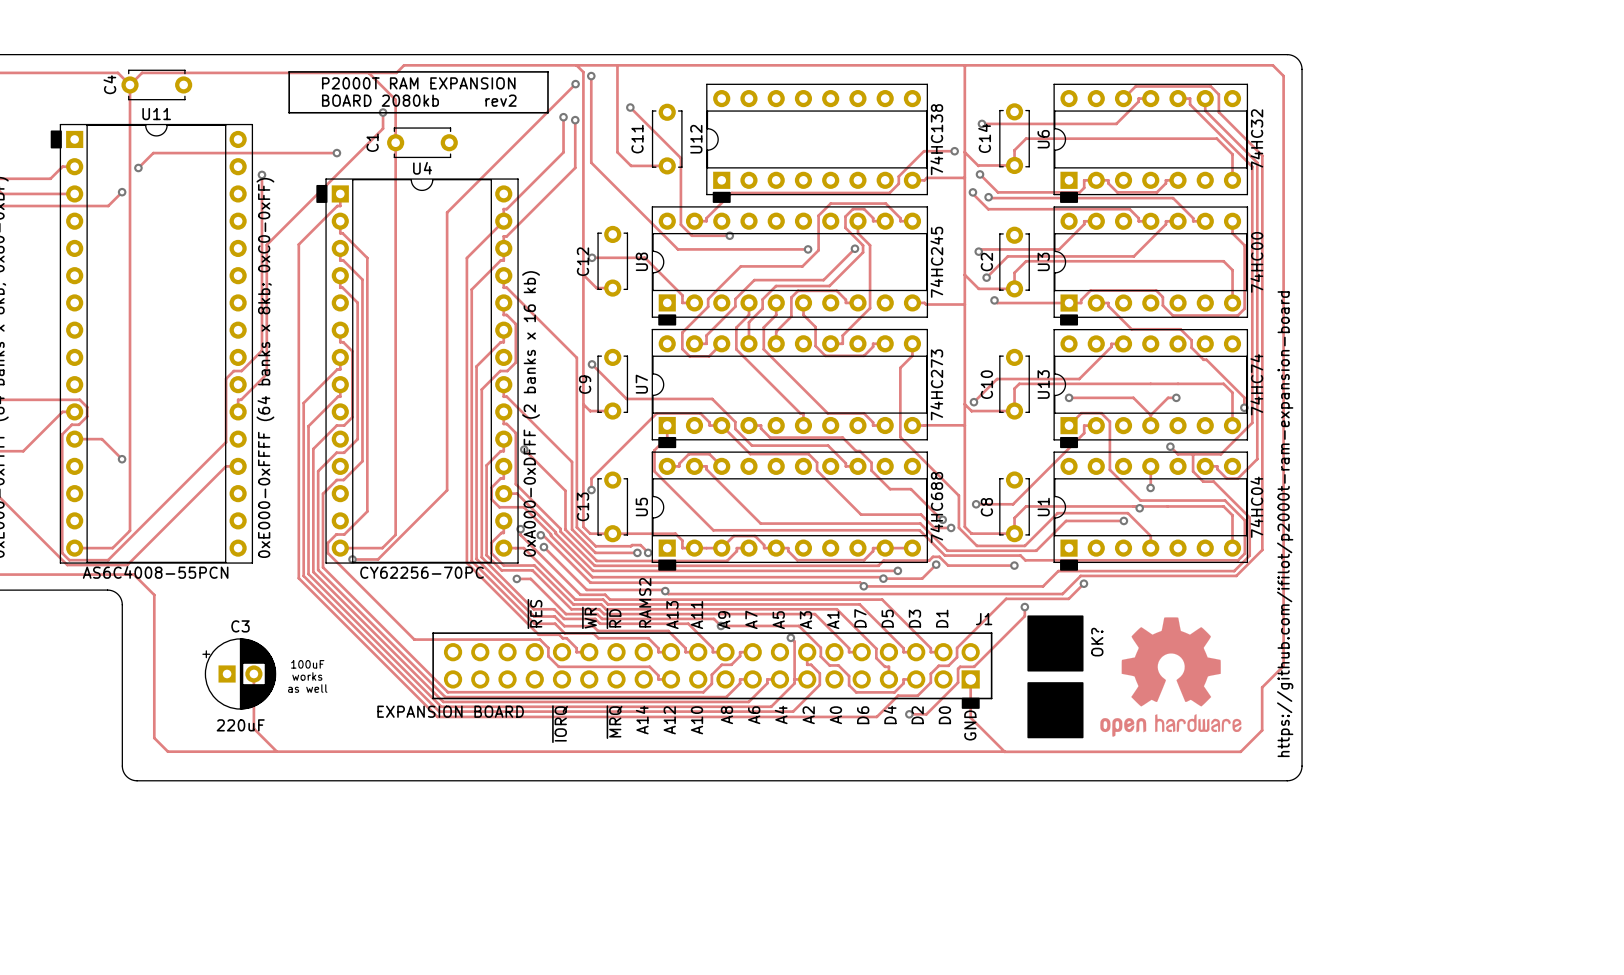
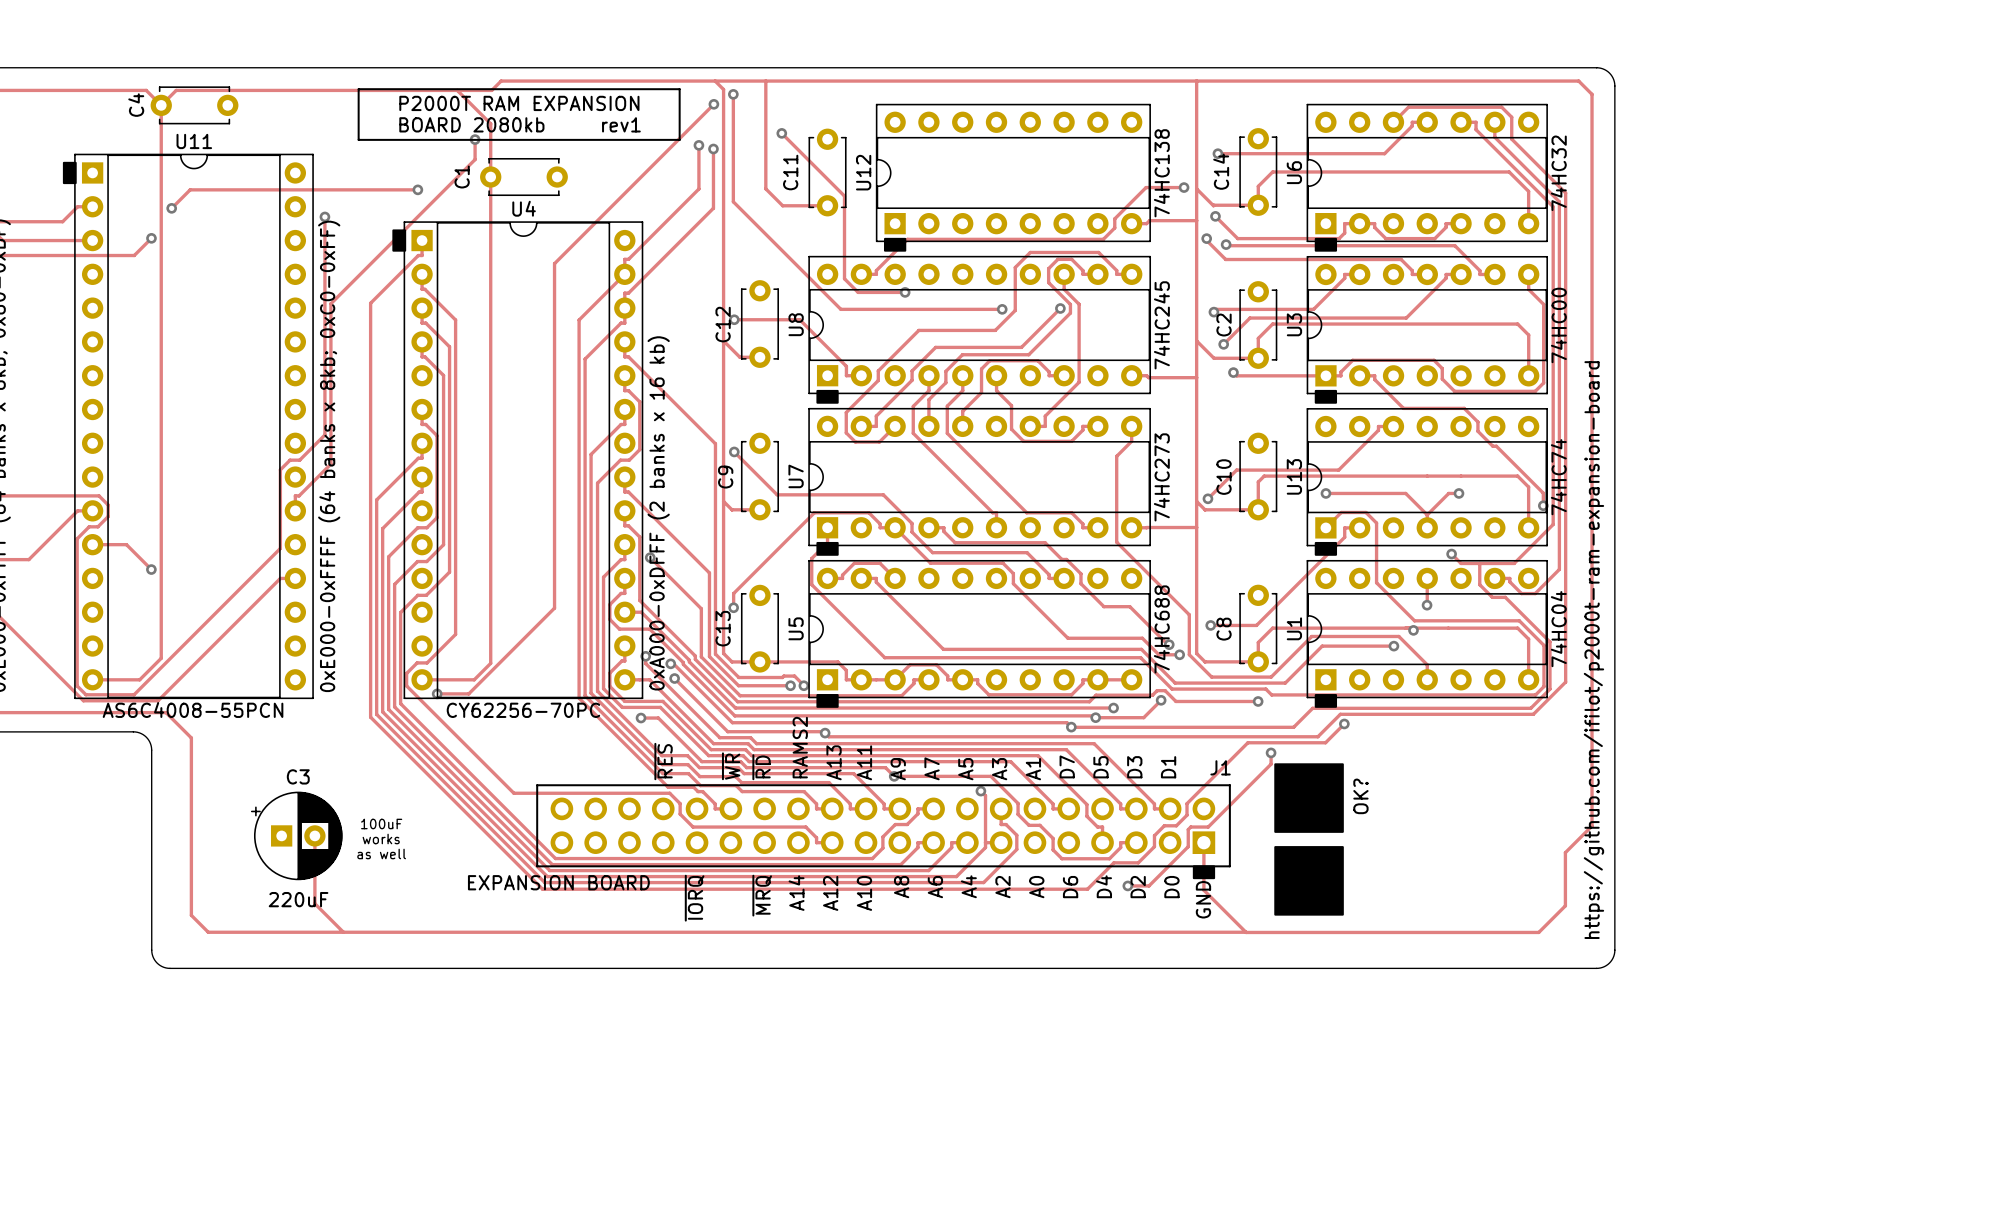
text: rev2 (501, 100) -> rev1 (621, 124)
drawing: [1100, 617, 1242, 737] -> none

